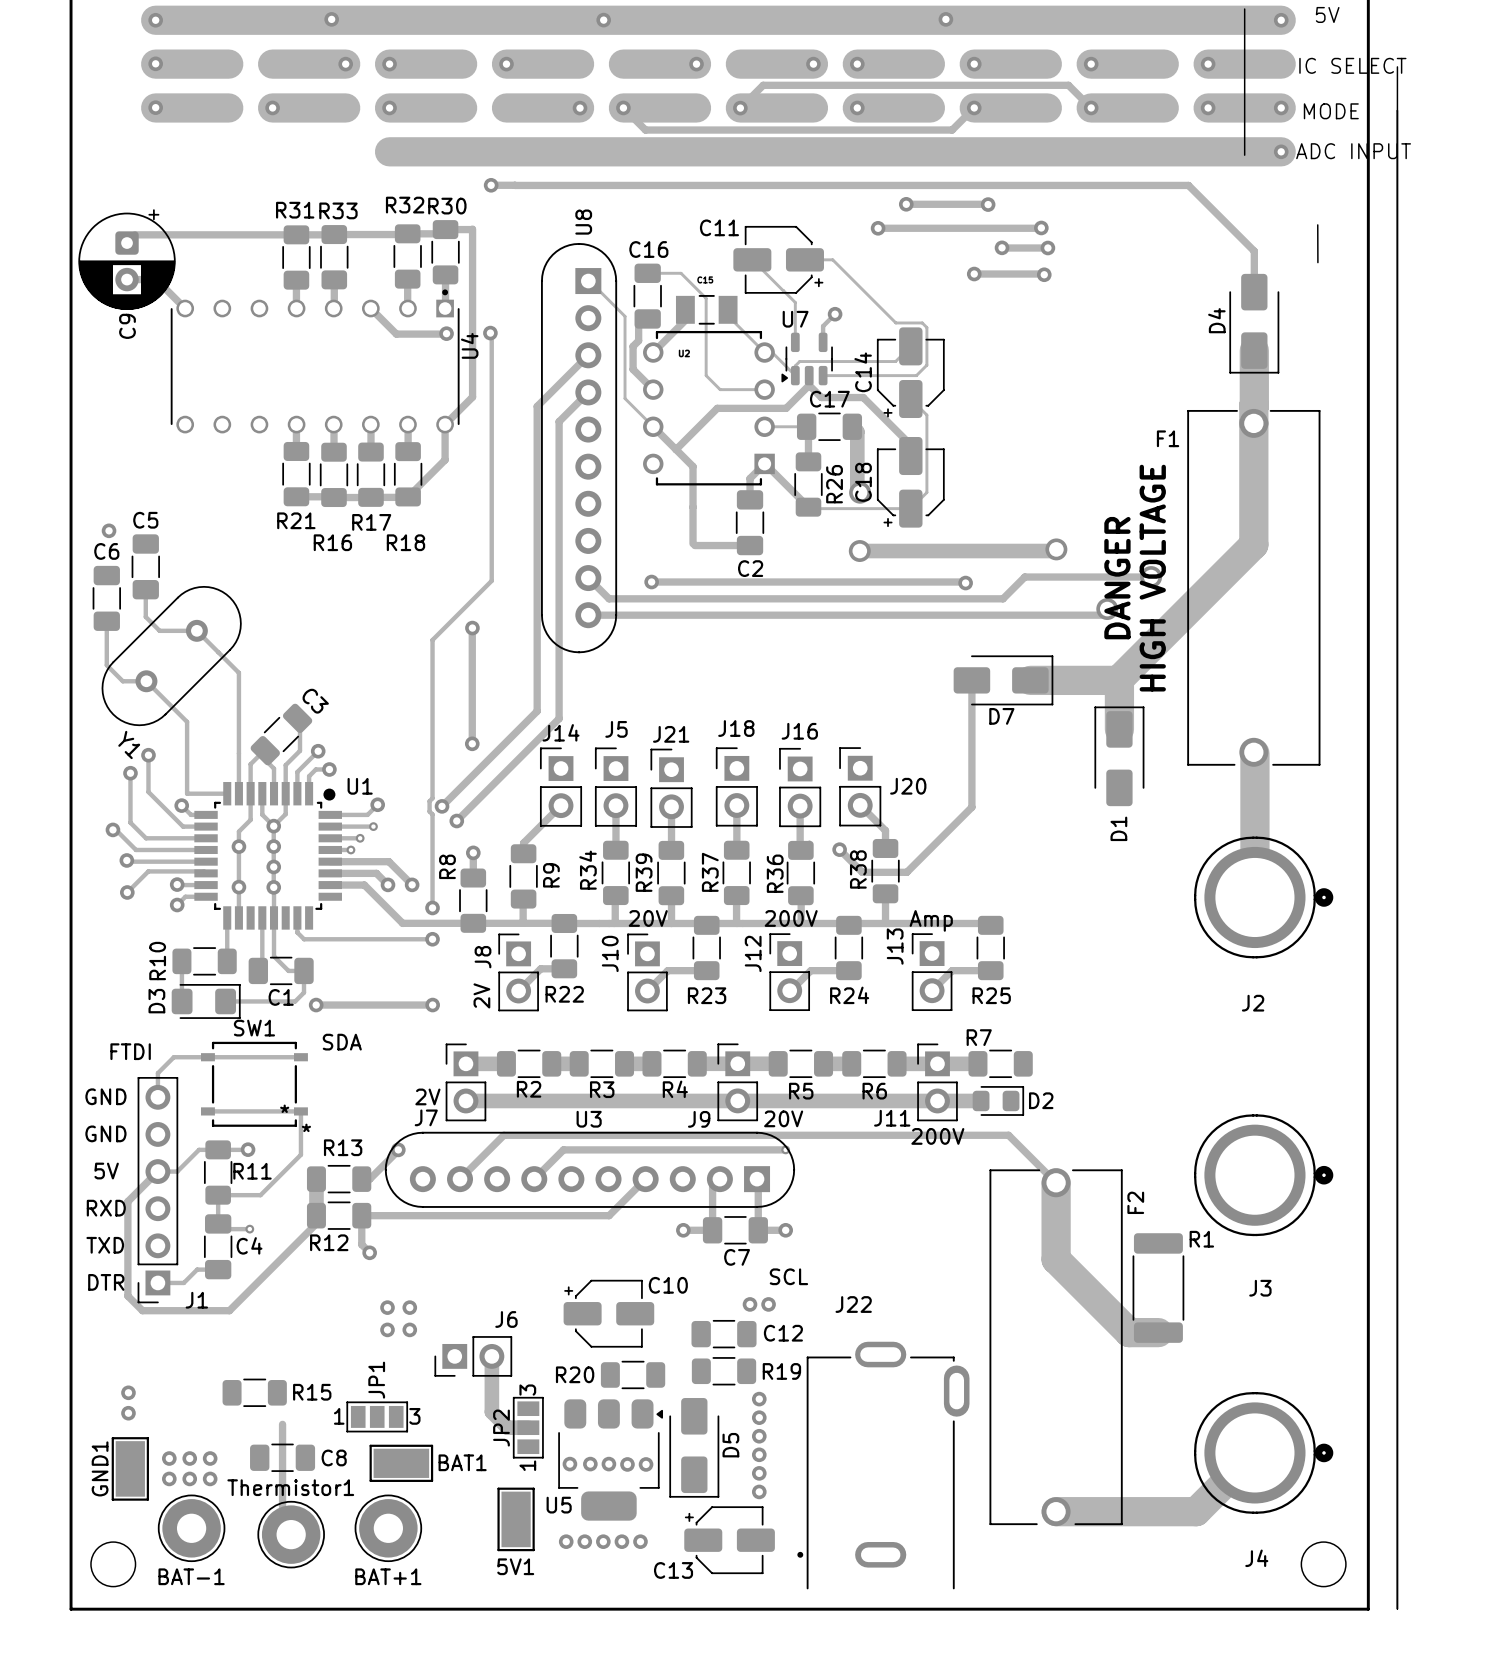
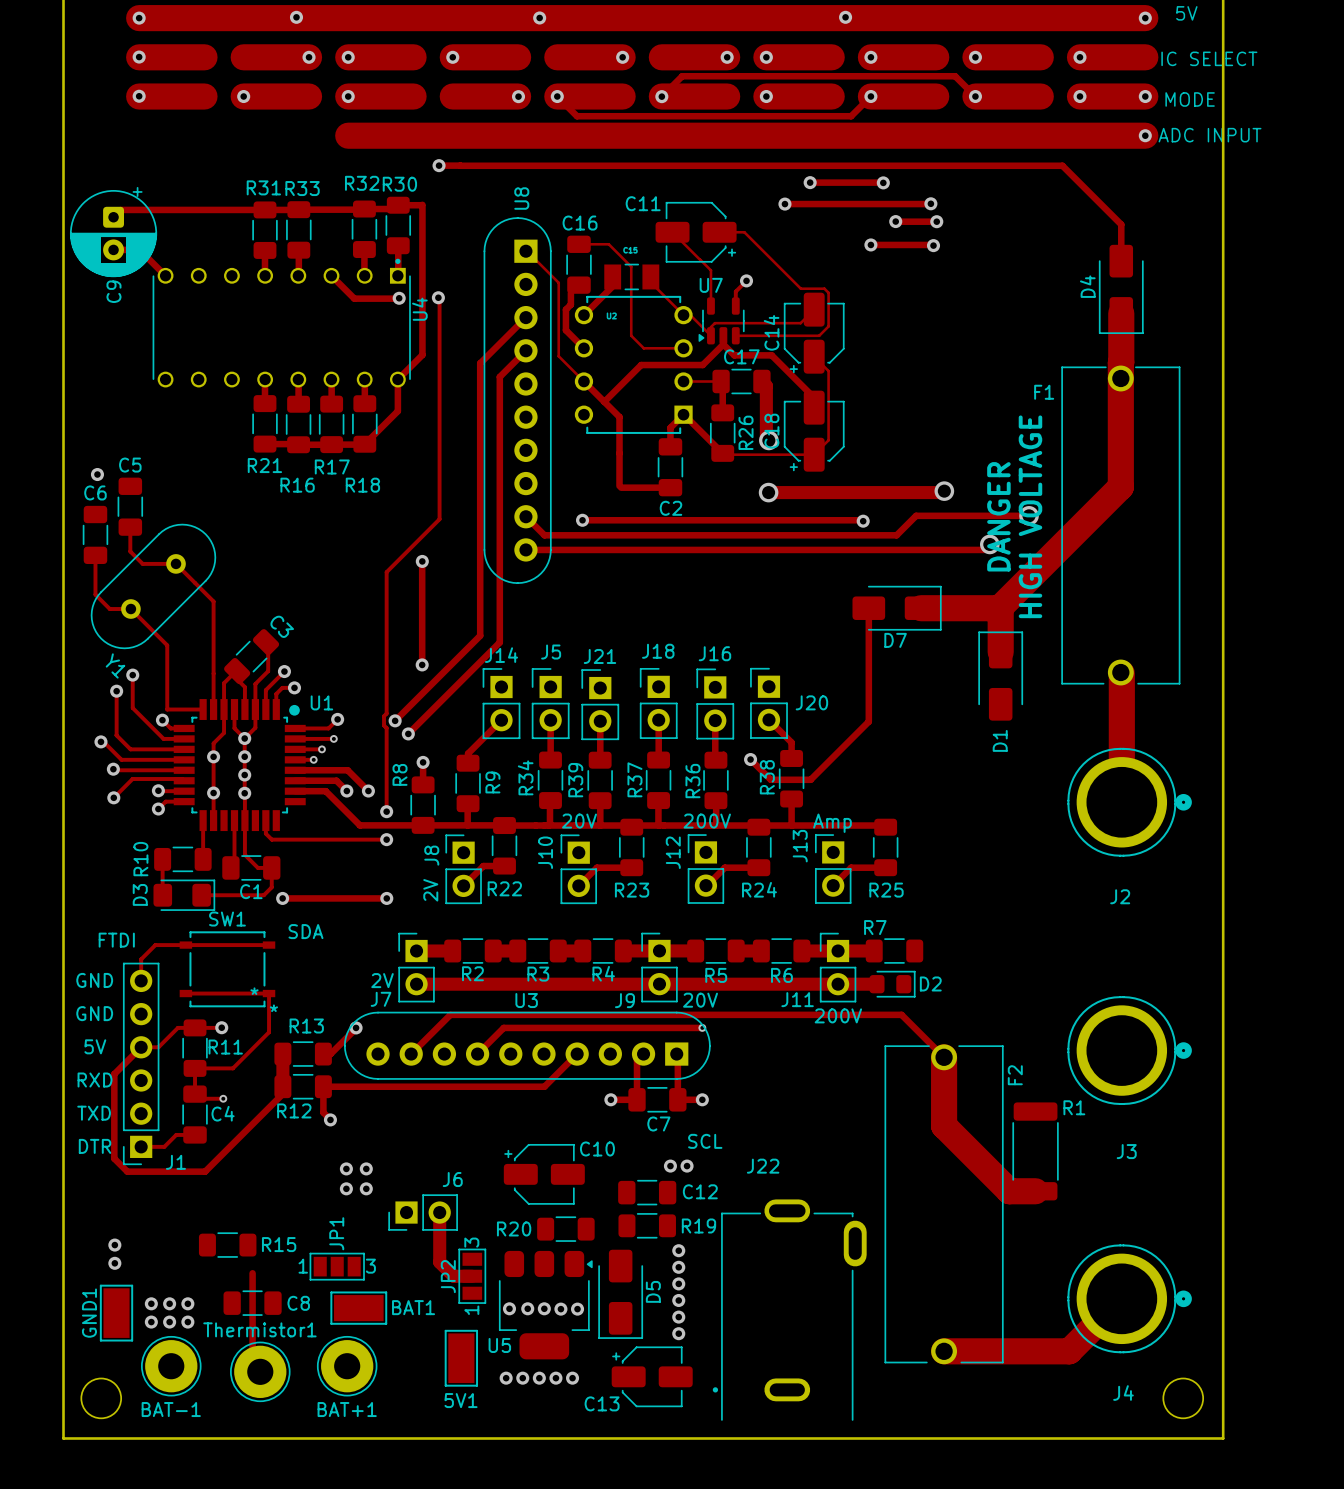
line: (1244, 9) (1244, 155) -> none
line: (1397, 66) (1397, 1609) -> none
line: (1317, 224) (1317, 262) -> none

